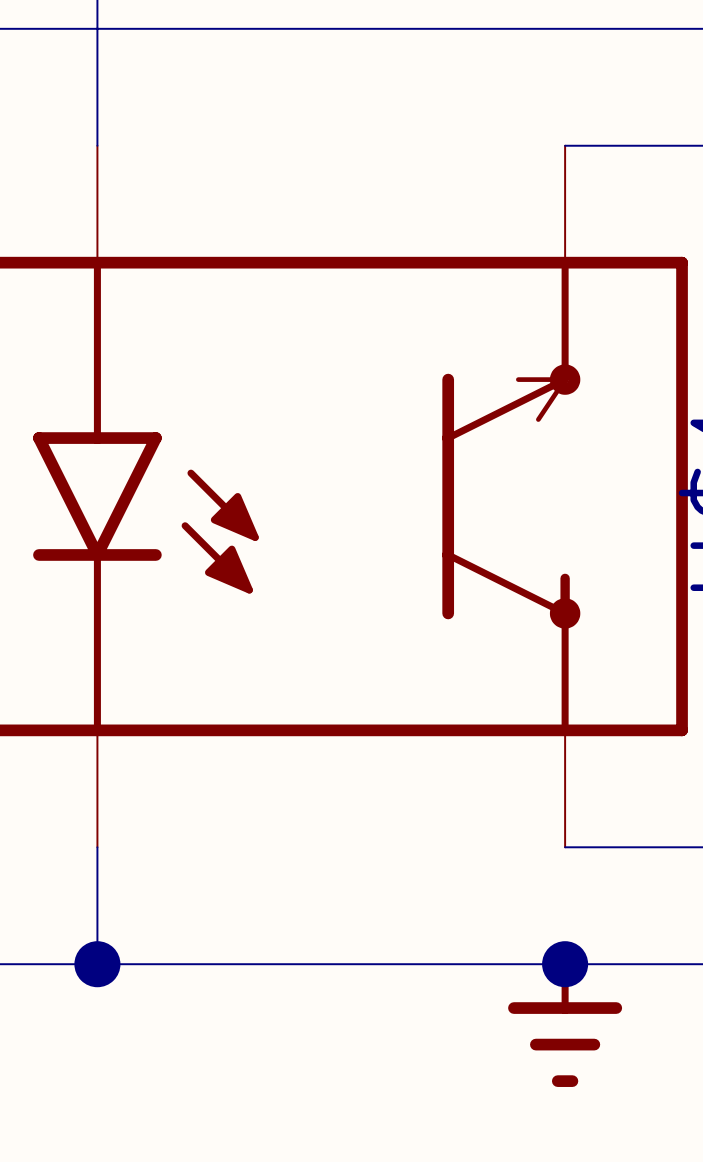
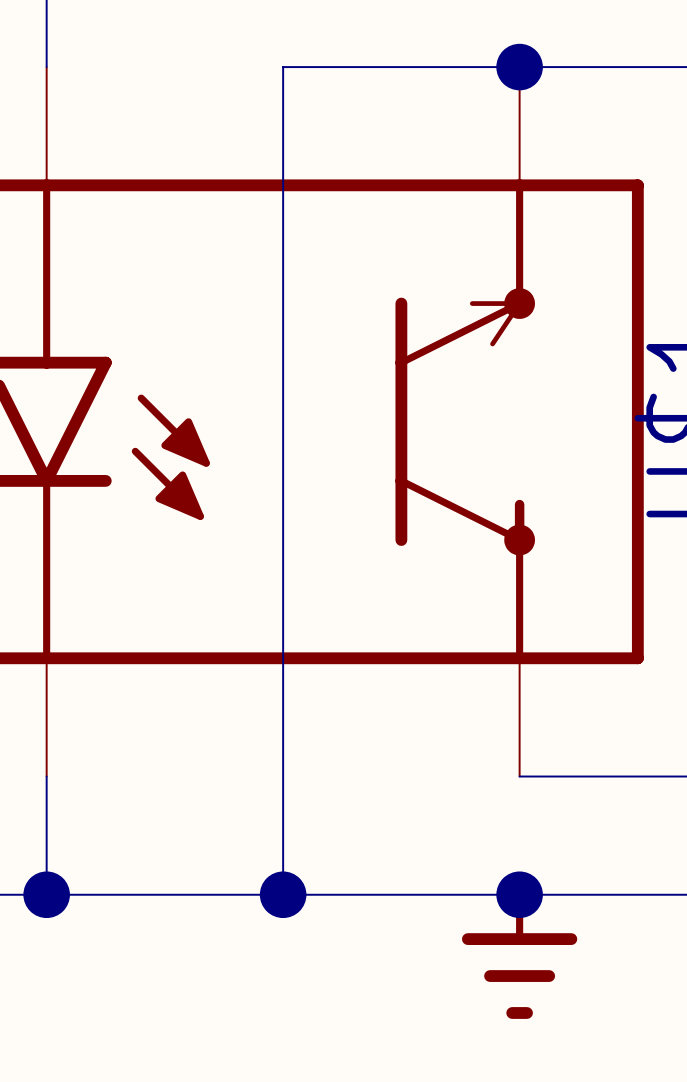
wire: none -> (519, 67) (283, 67) (283, 894)
junction: none -> (519, 67)
junction: none -> (283, 894)

